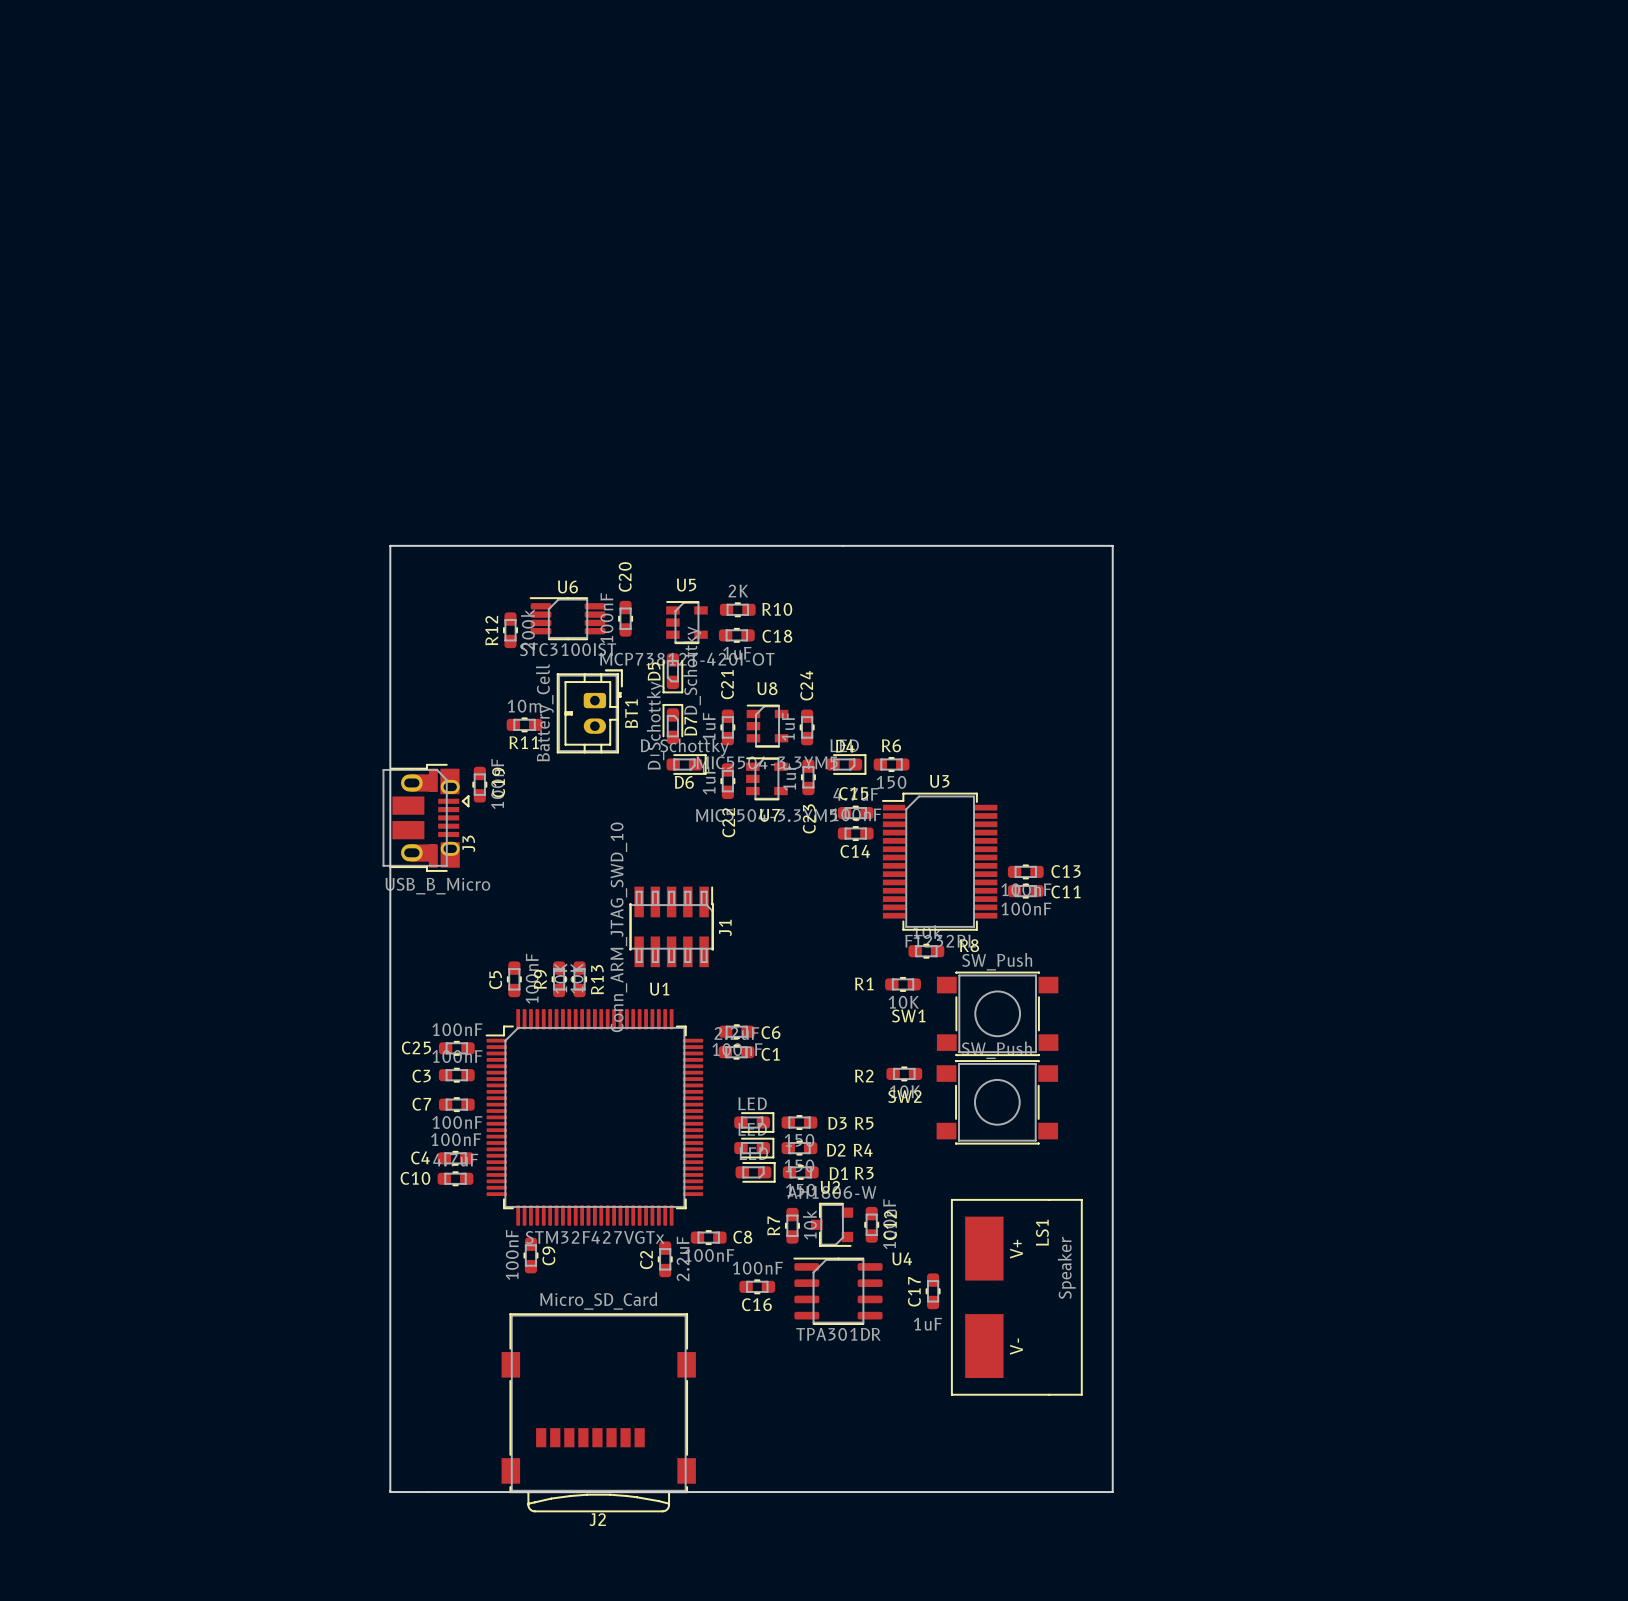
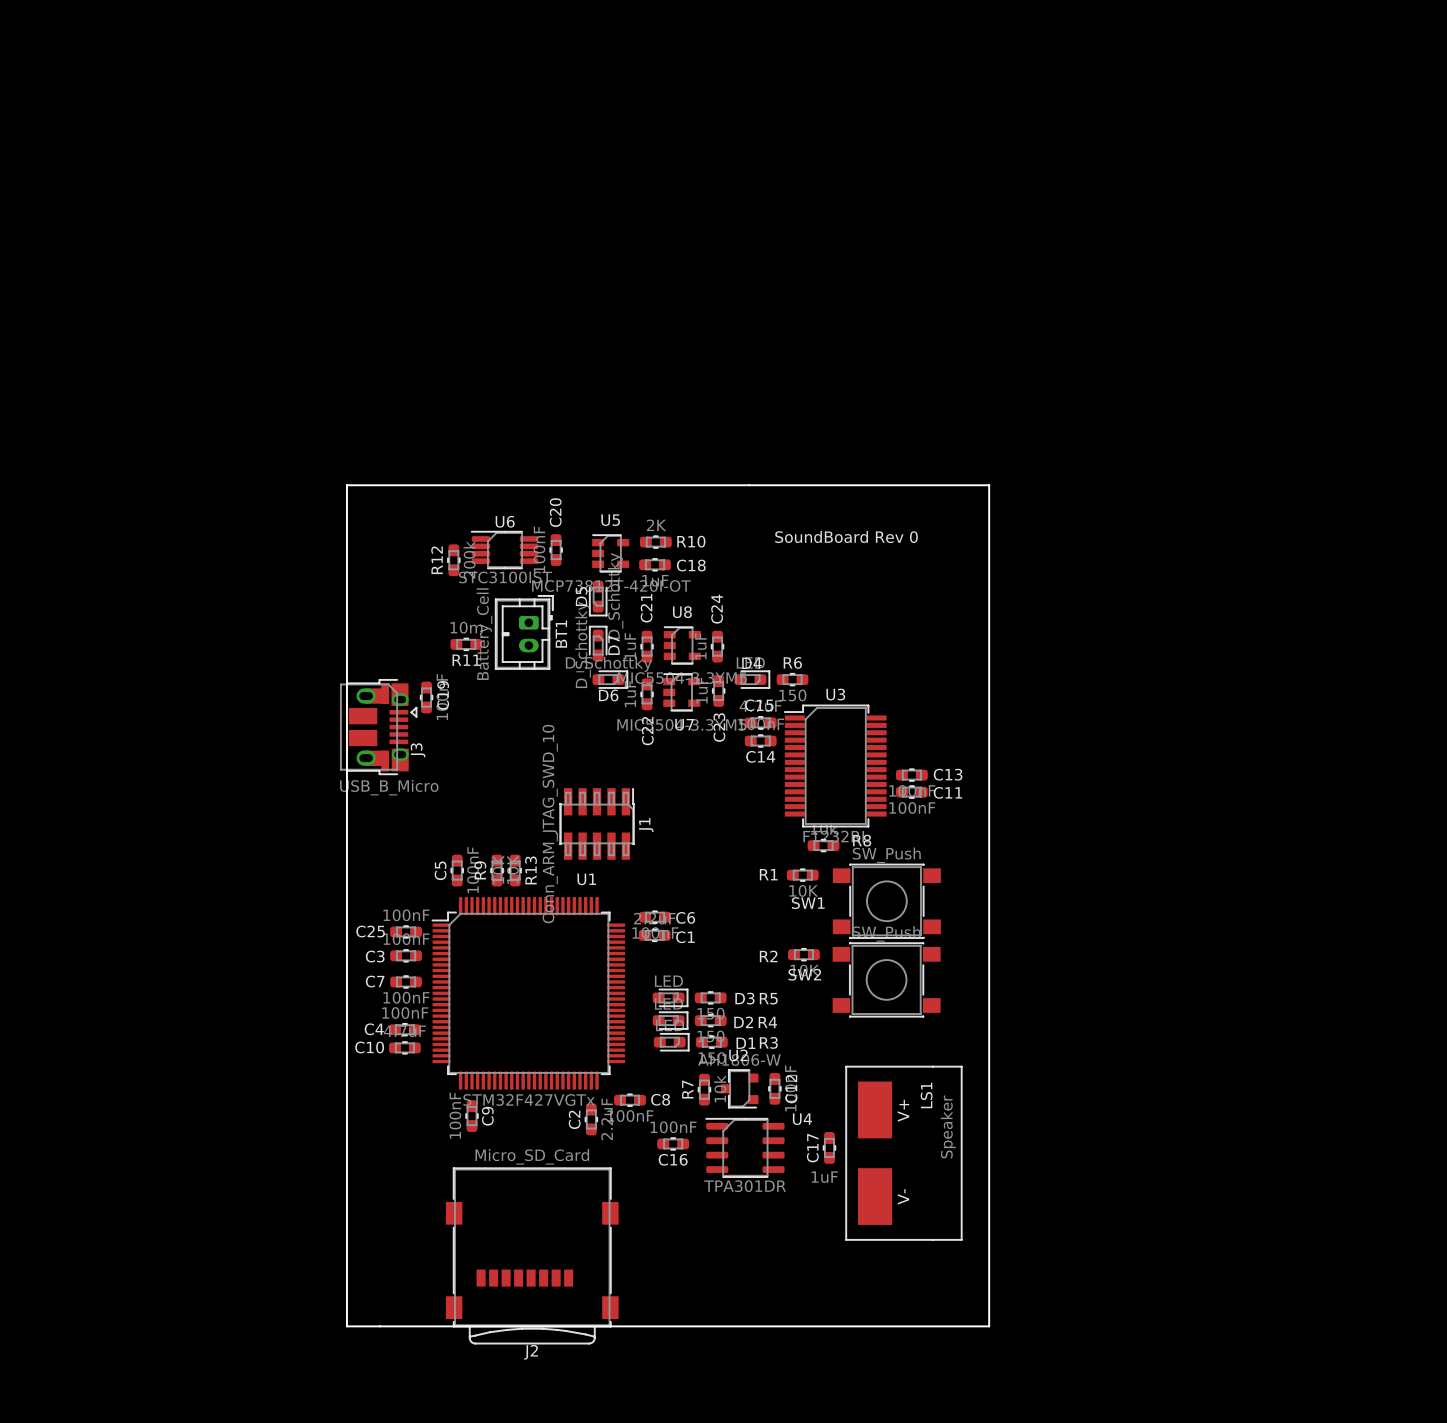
text: none -> SoundBoard Rev 0 (846, 536)

